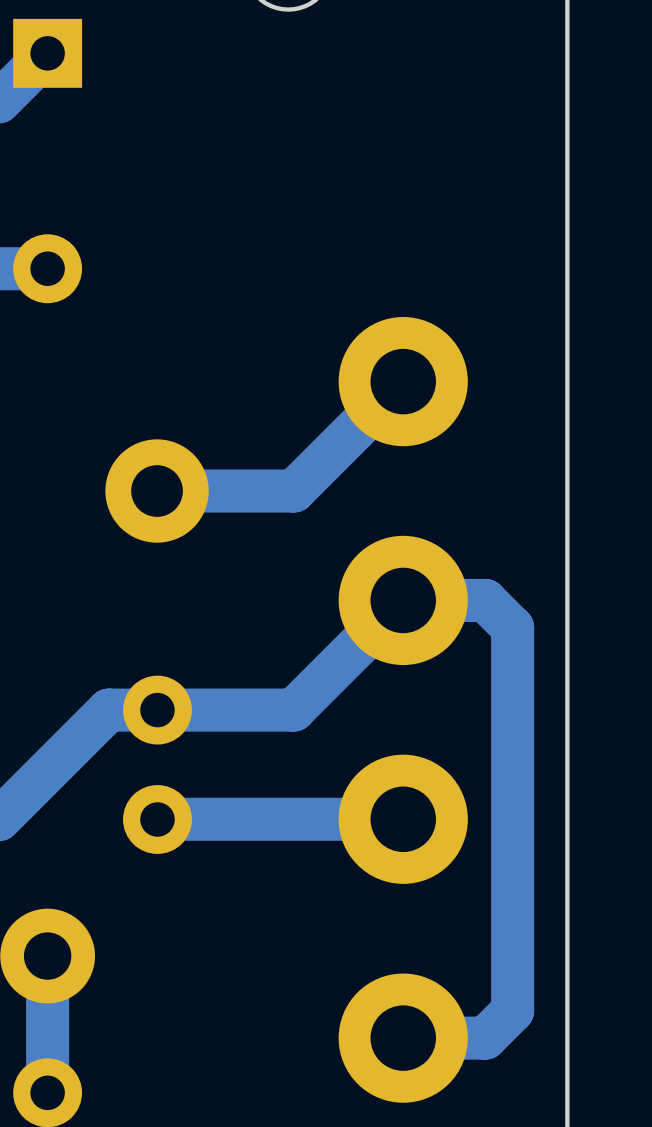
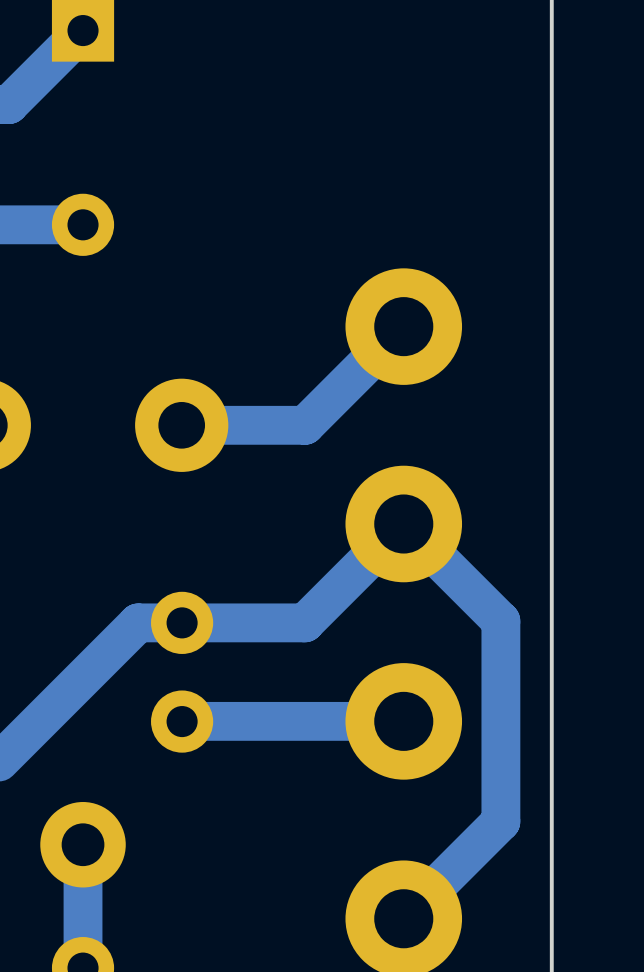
bottom track: (403, 600) (485, 600) (512, 627) (512, 1010) (485, 1038) (403, 1038) -> (403, 524) (500, 621) (500, 821) (403, 918)

